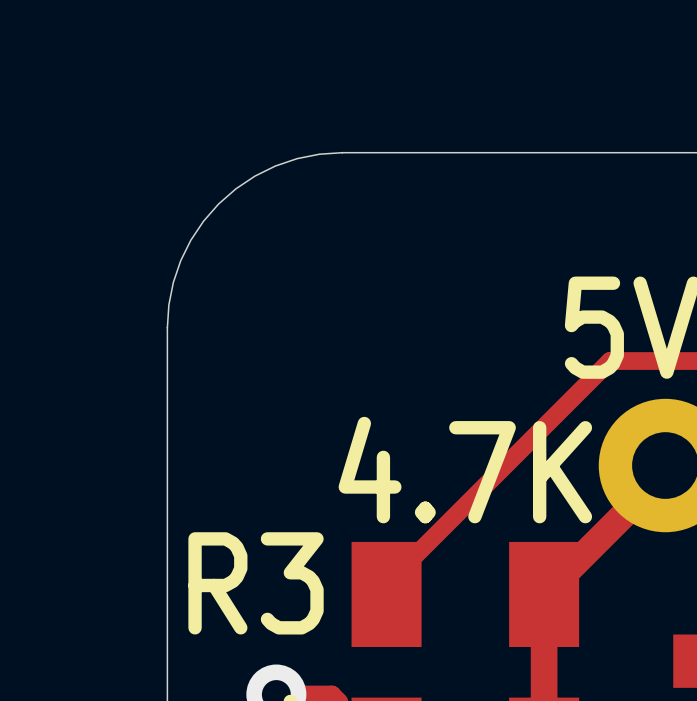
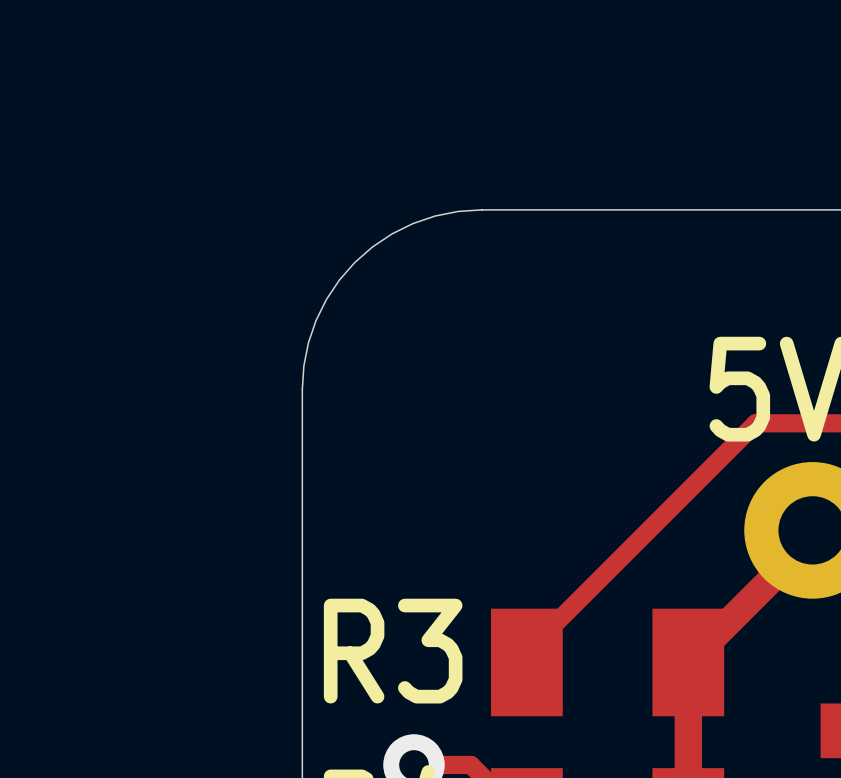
R3 value: 4.7K (465, 470) -> none

